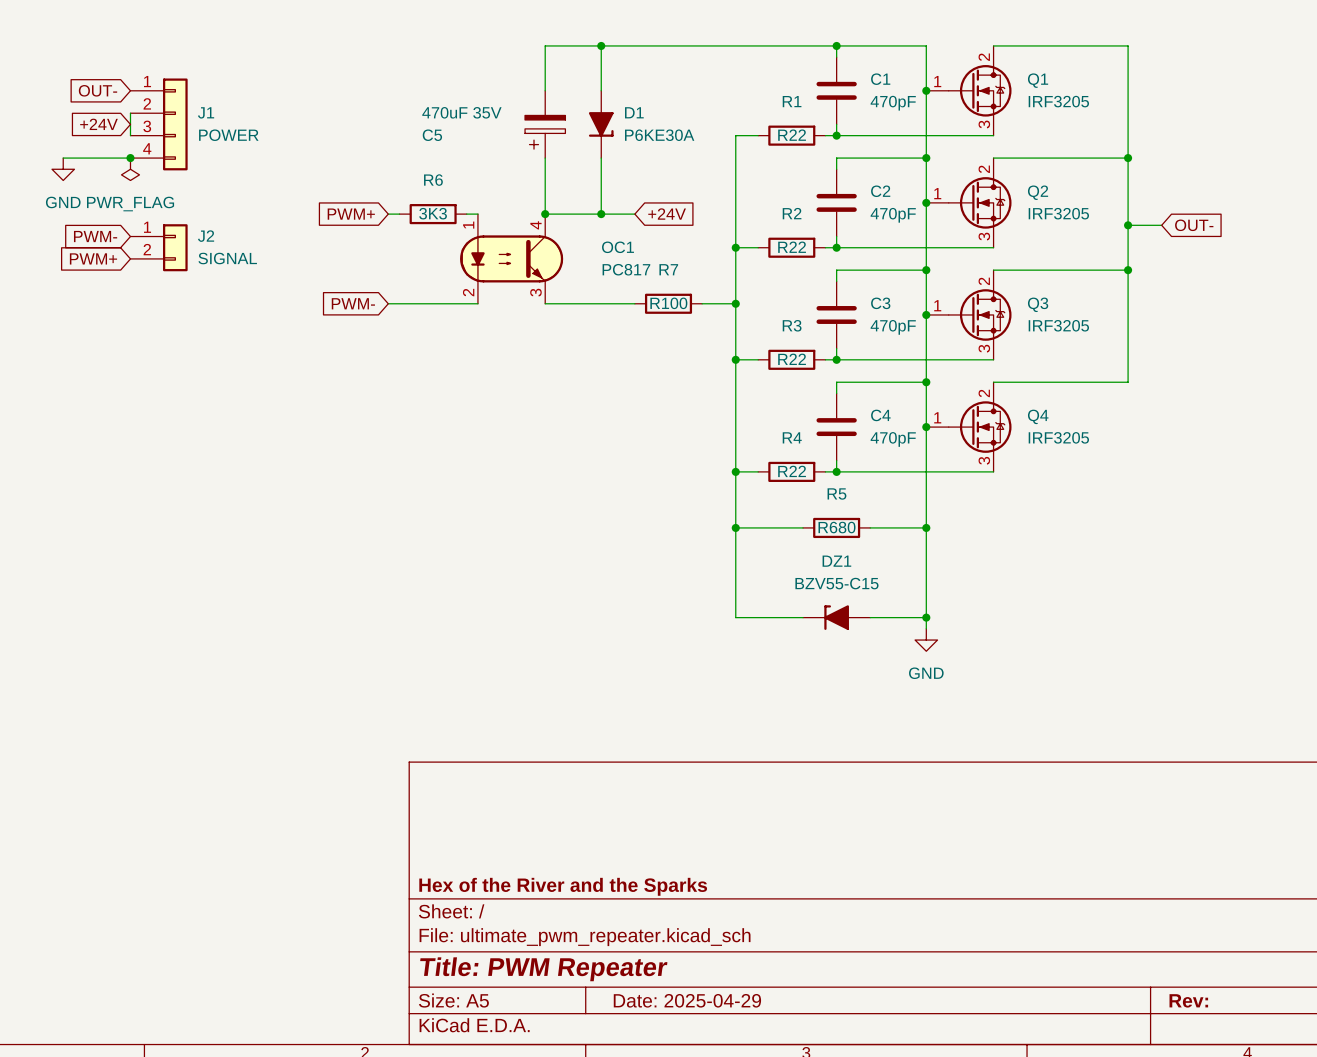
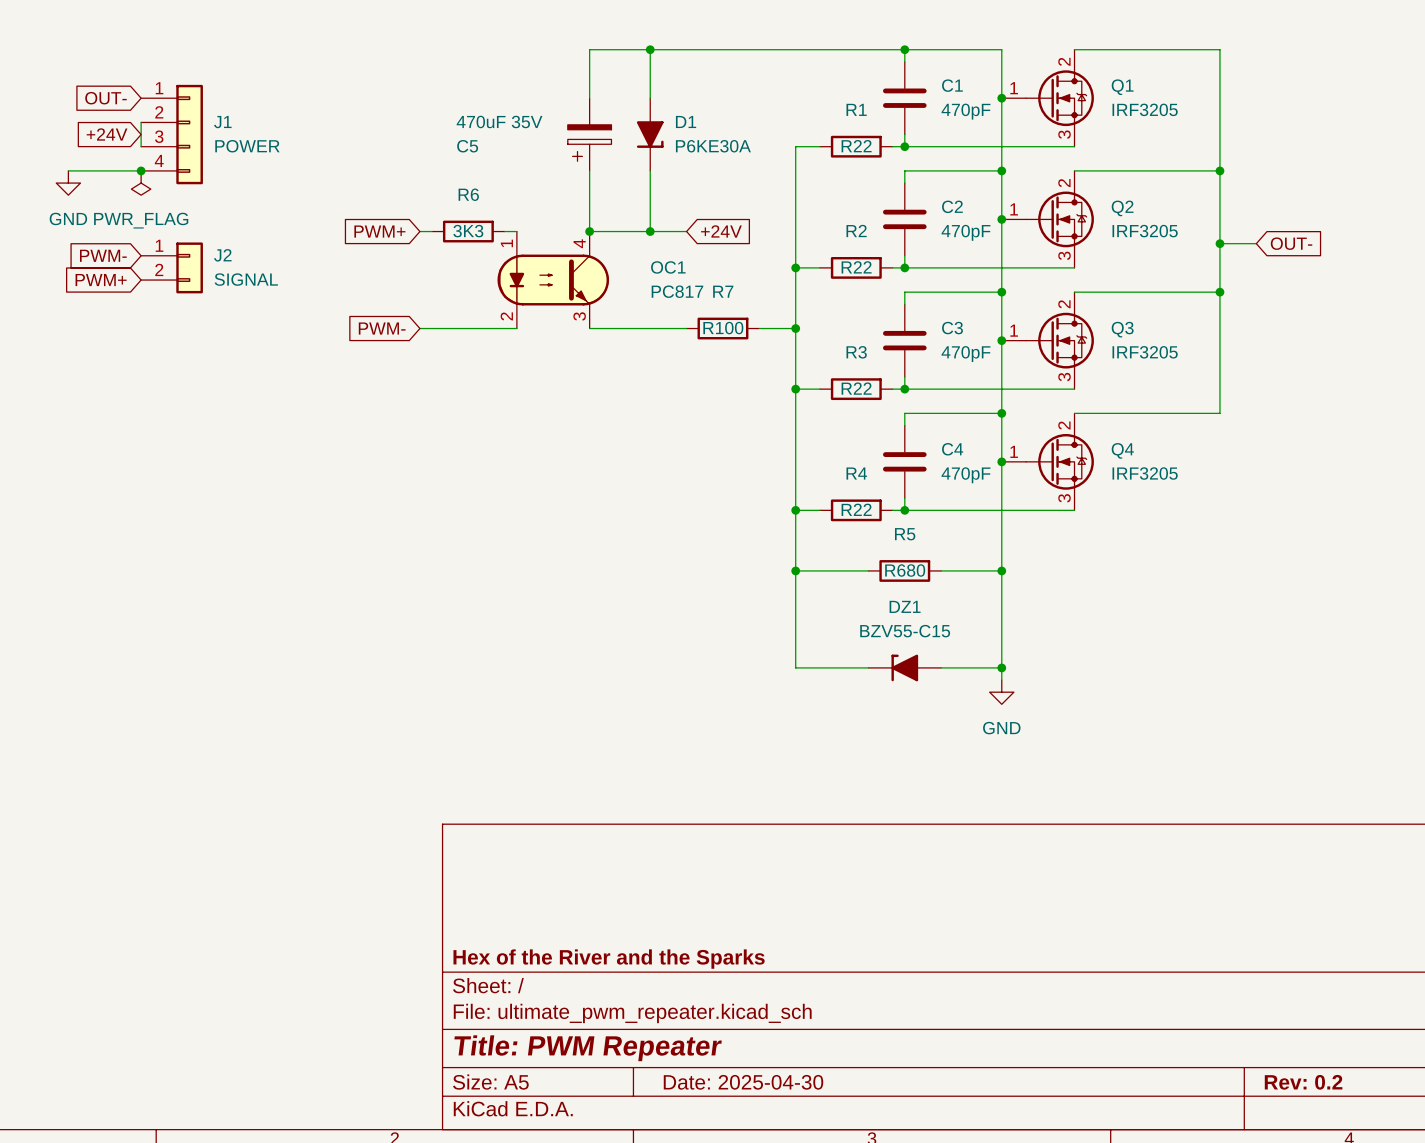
title block: Date: 2025-04-29 (687, 1000) -> Date: 2025-04-30 (743, 1082)
title block: Rev: (1188, 1000) -> Rev: 0.2 (1303, 1082)

